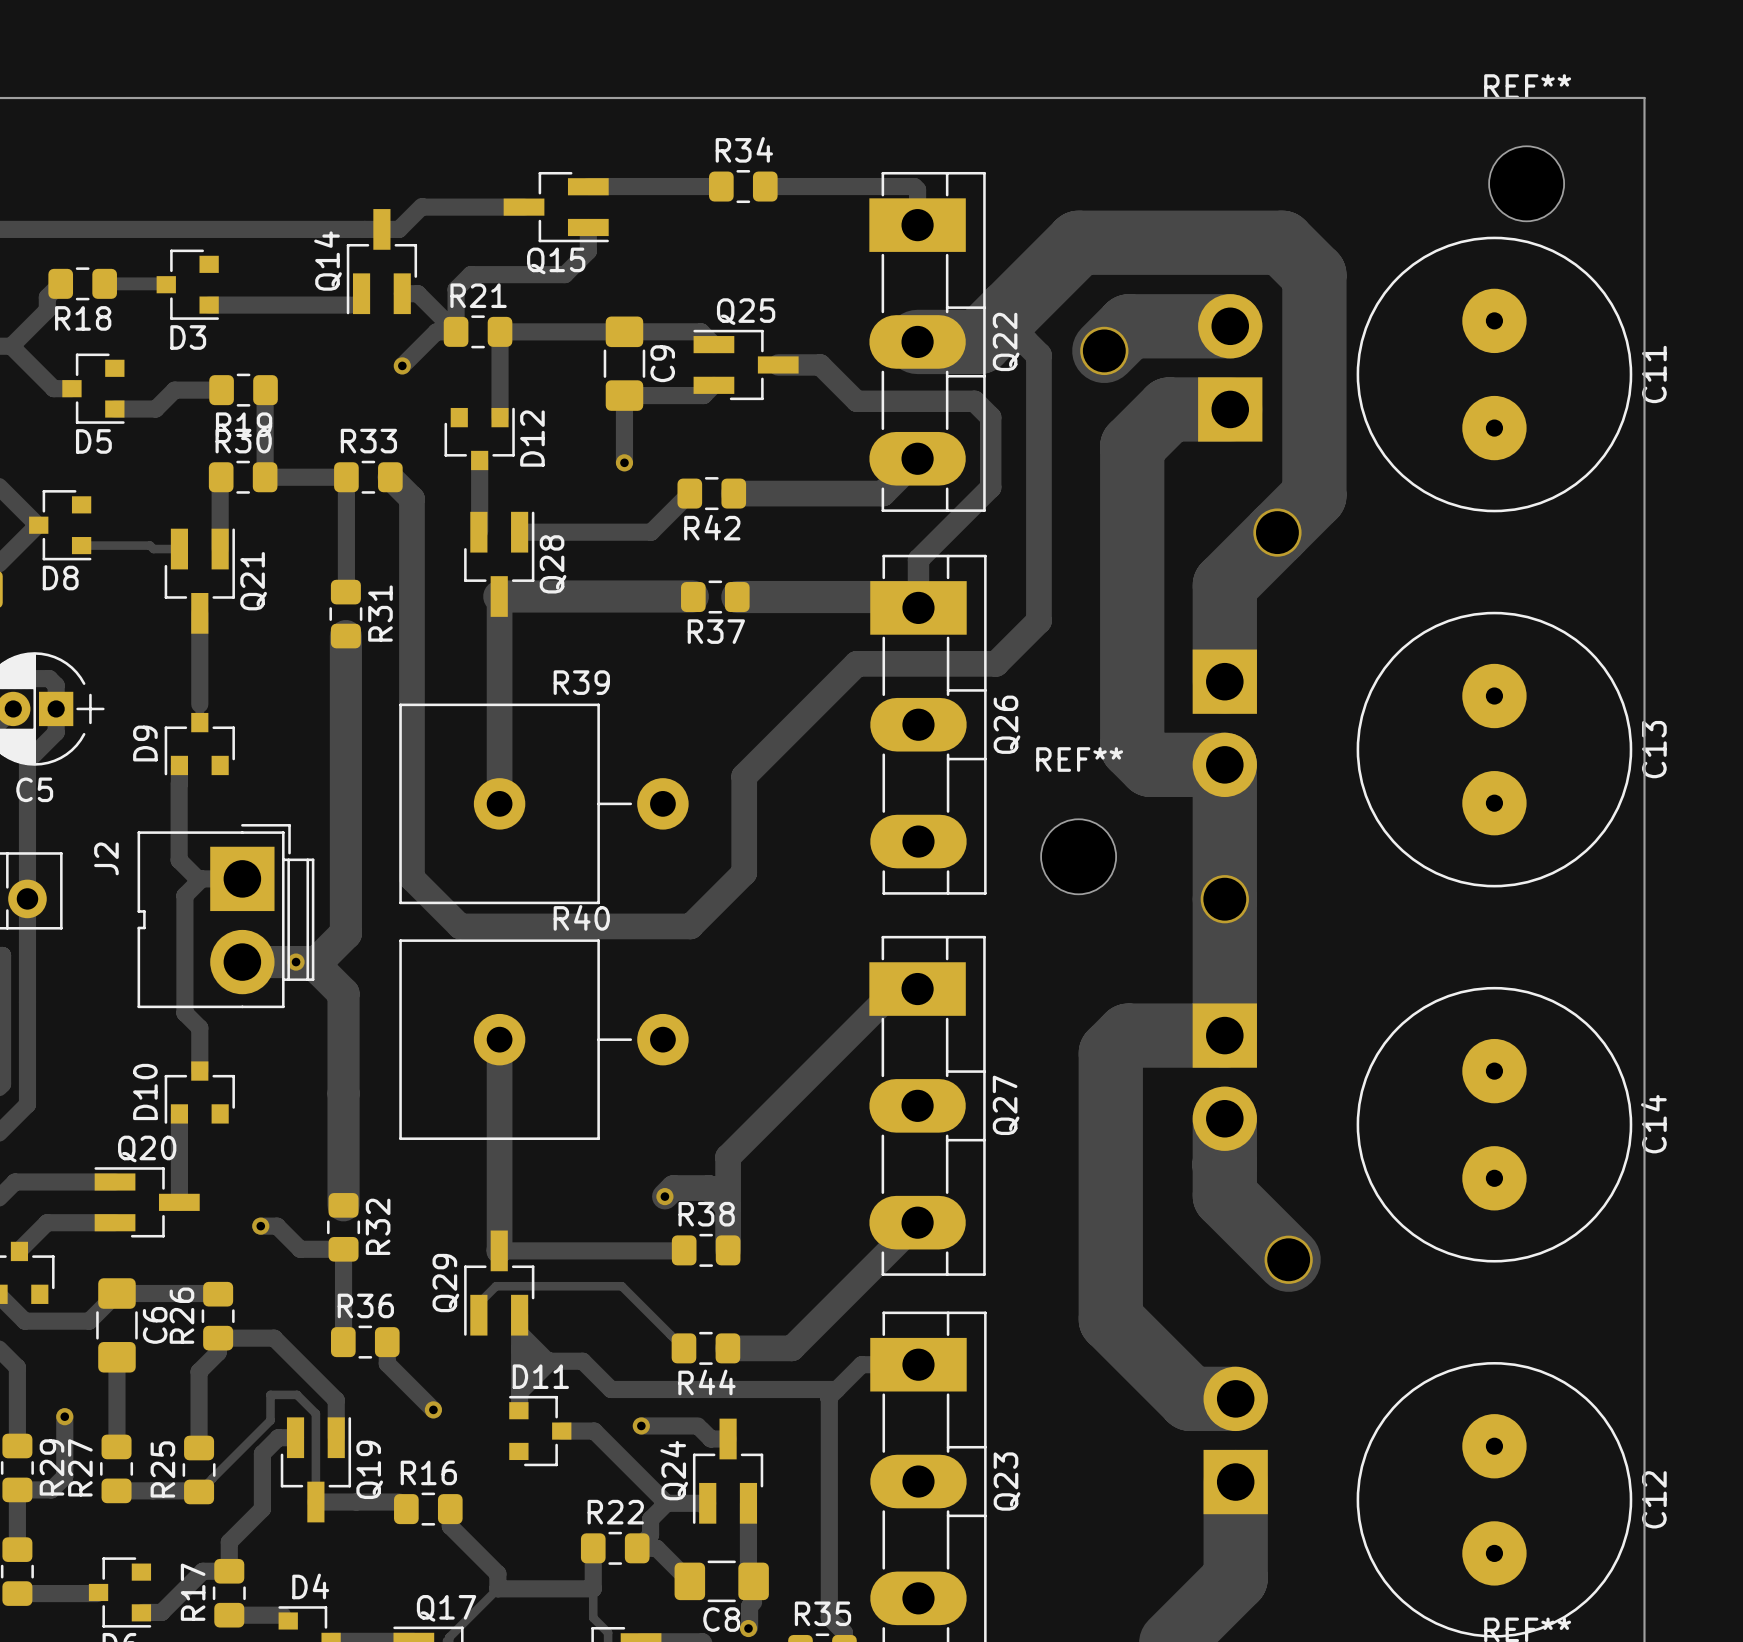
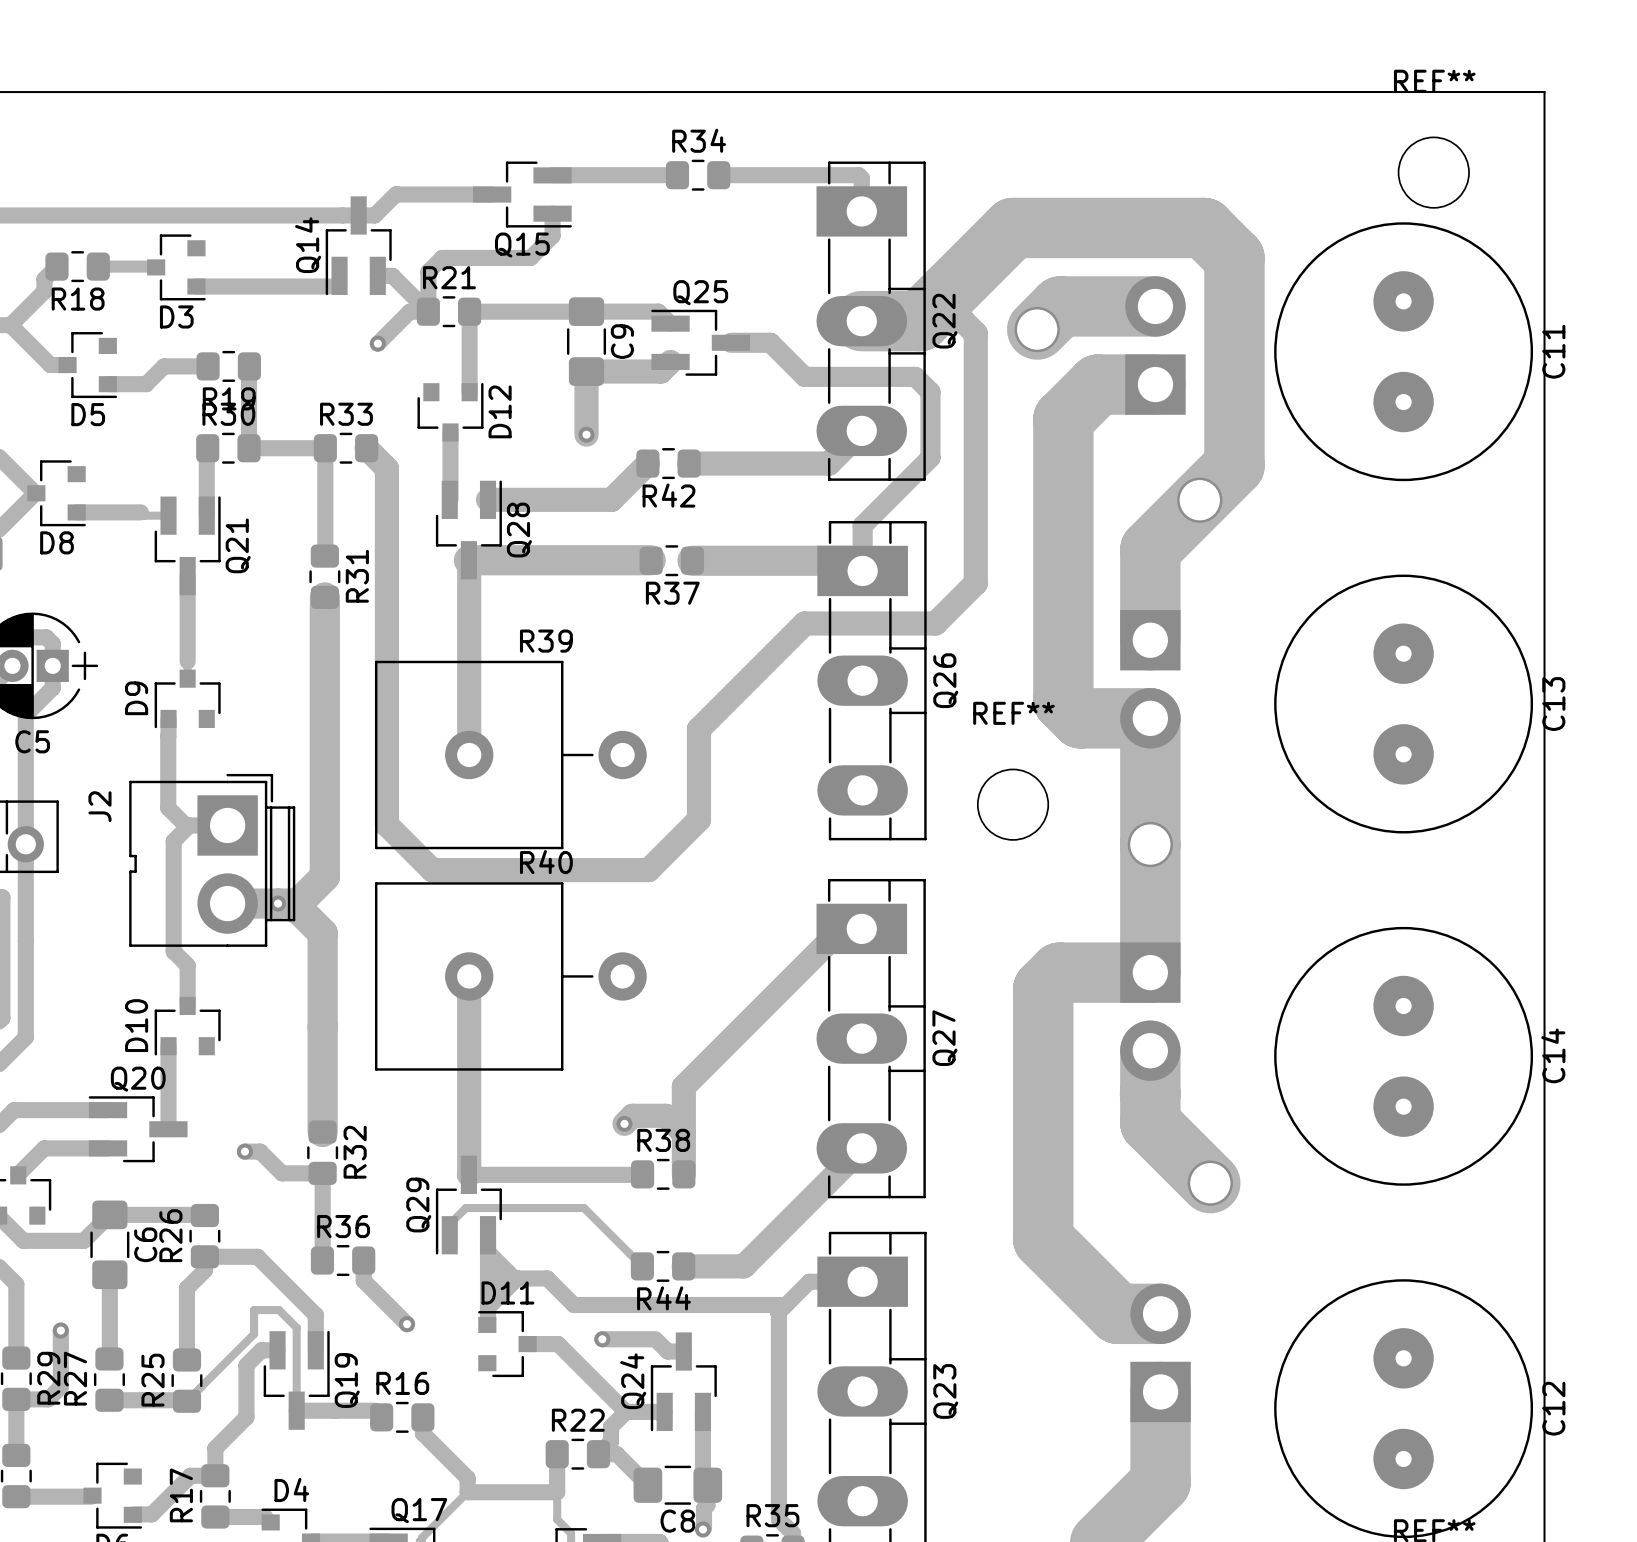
track width: thin (713, 385) (703, 395) (624, 395) (624, 462) -> thick (670, 361) (660, 371) (586, 371) (586, 434)
track width: thin (689, 493) (651, 532) (519, 532) -> thick (647, 463) (611, 499) (488, 499)
track width: thin (81, 545) (150, 545) -> thick (76, 512) (140, 512)

